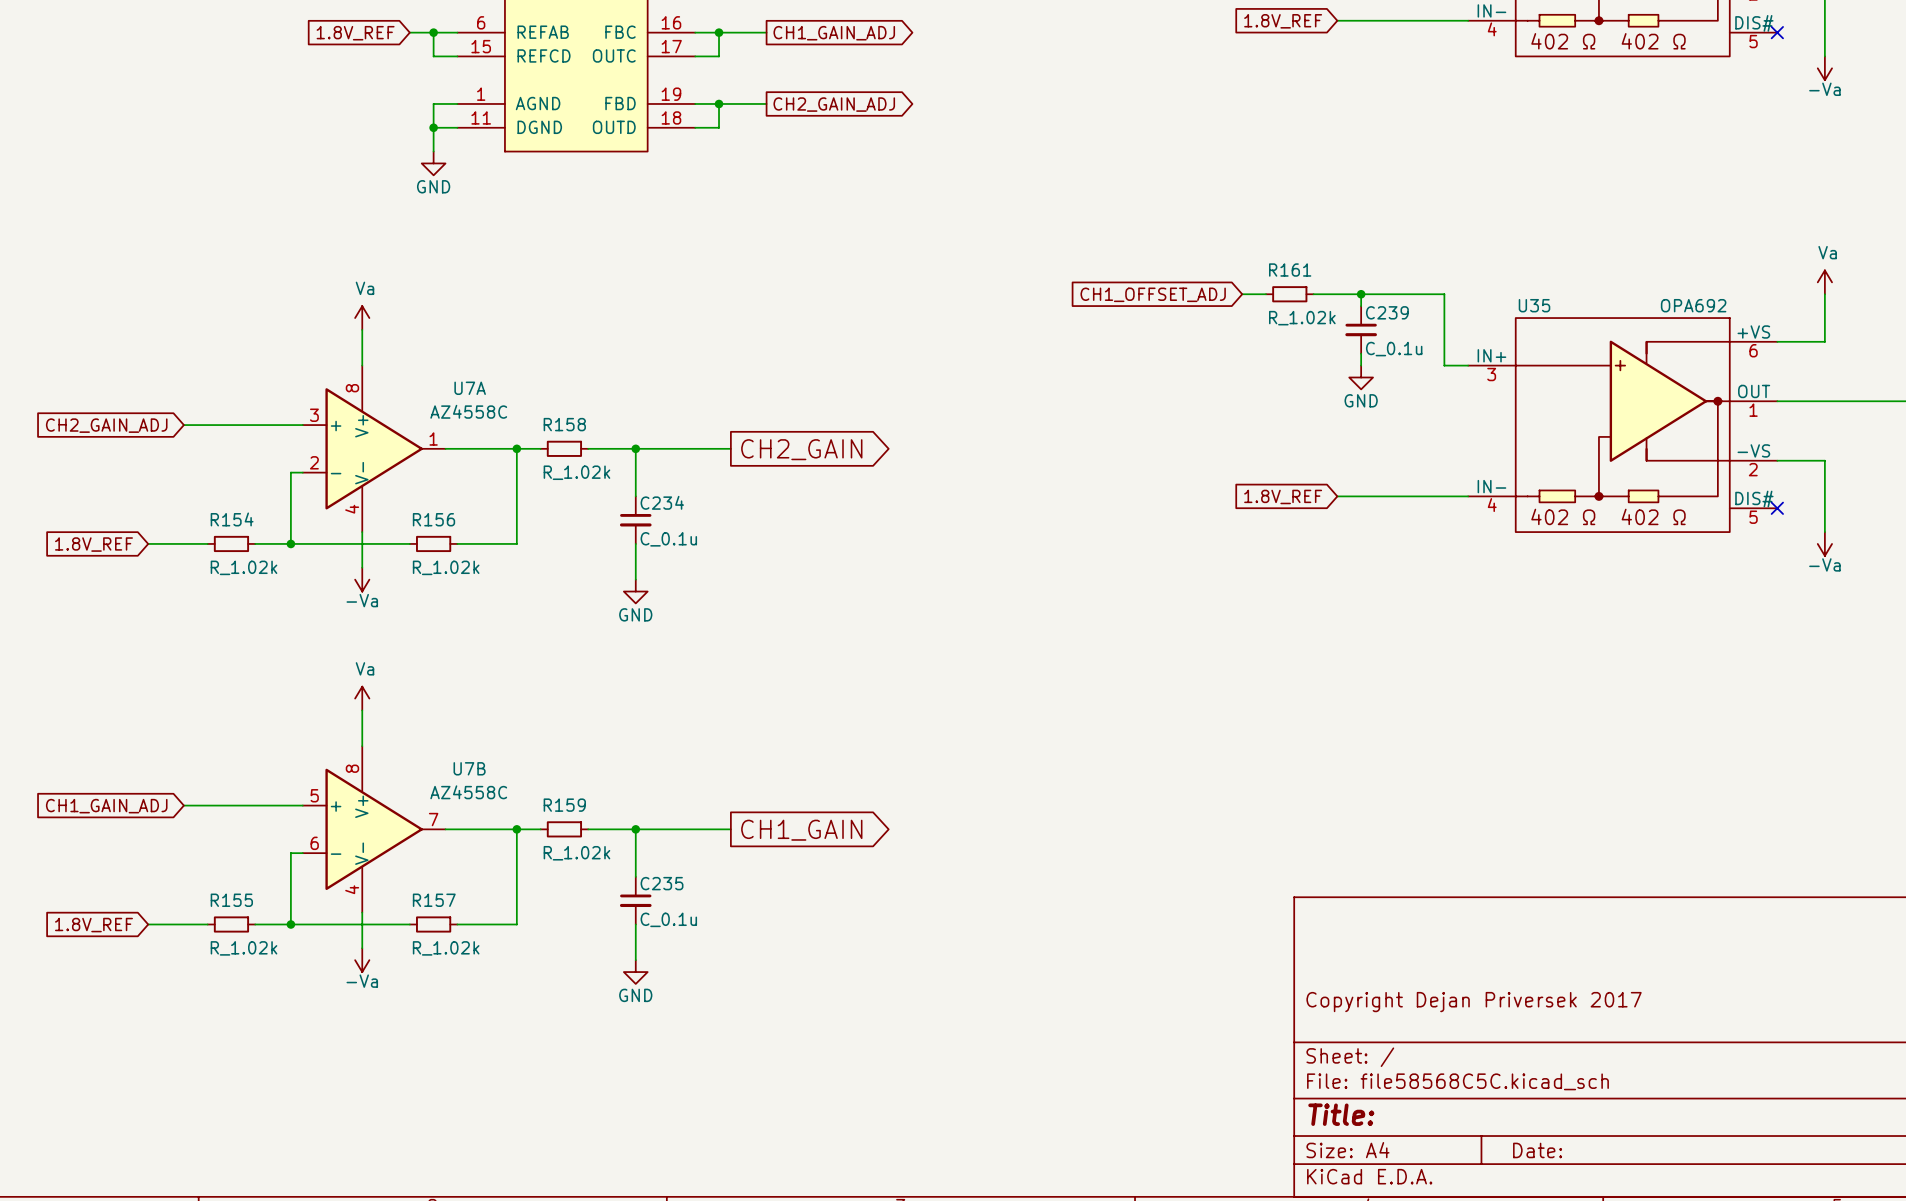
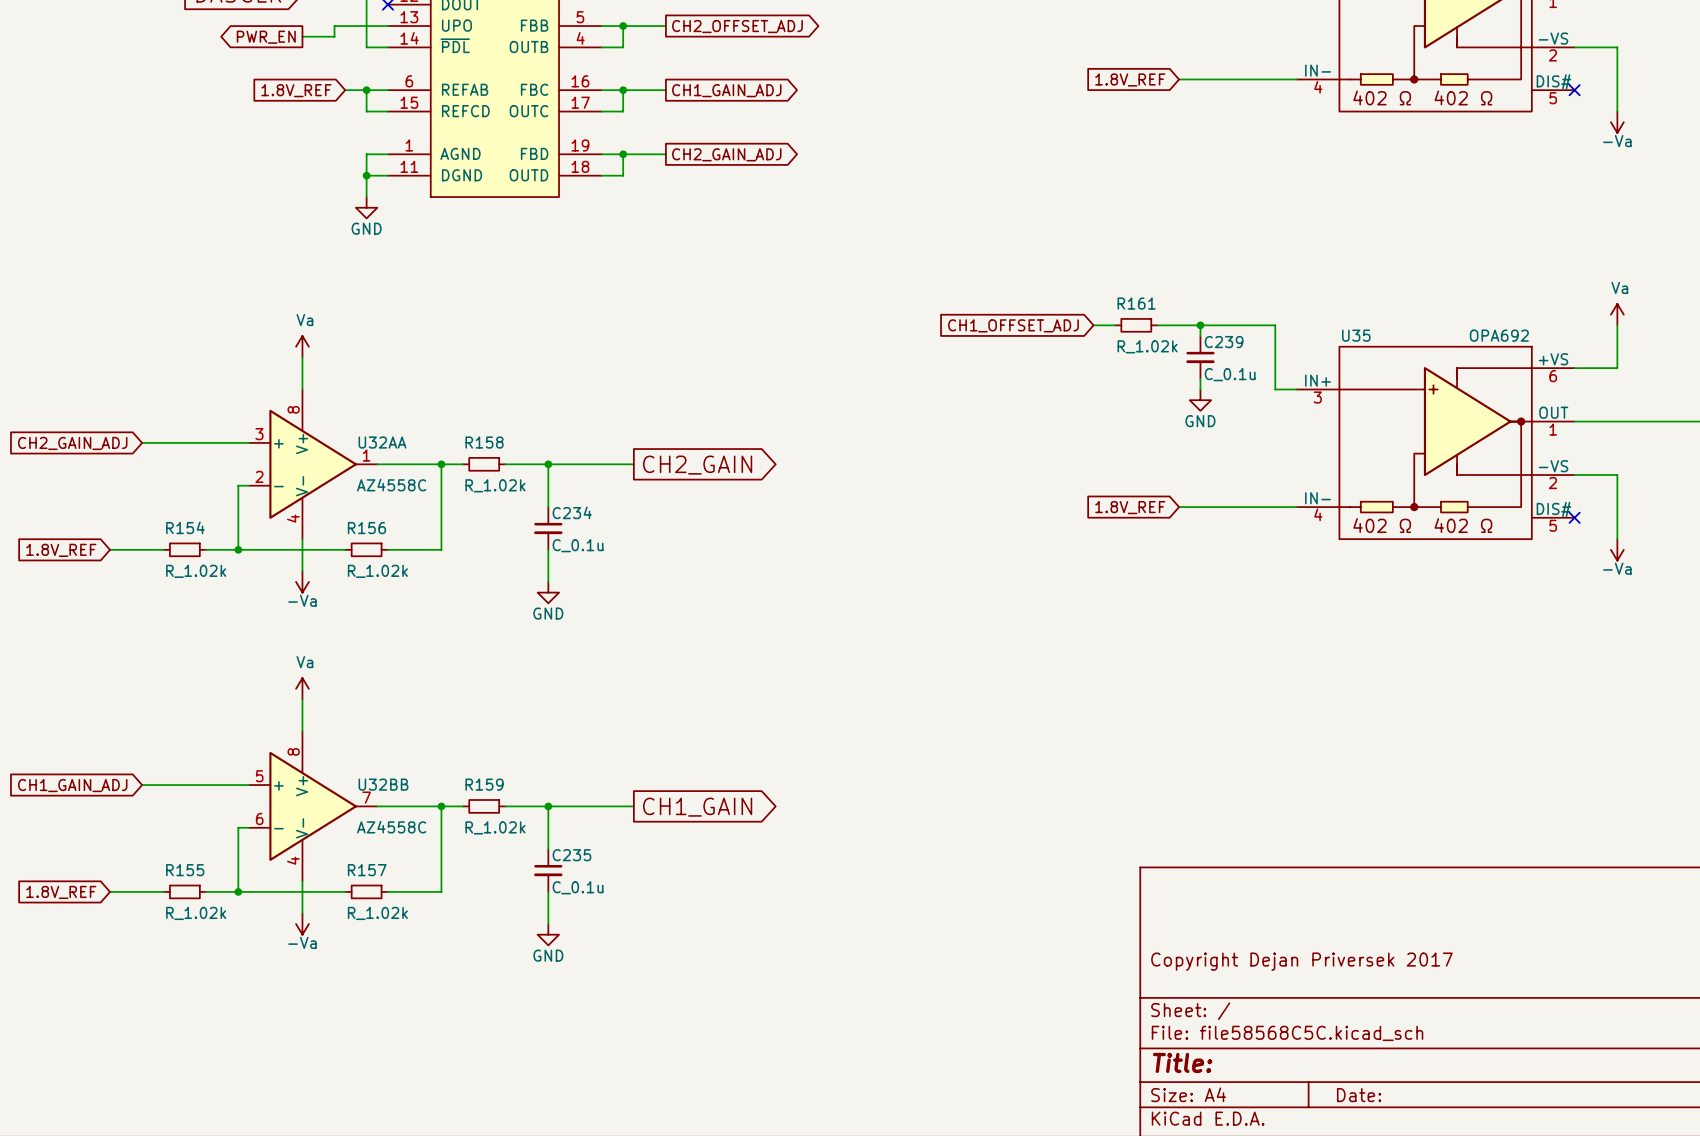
U7A name: U7A (470, 388) -> U32AA (382, 442)
U7A value position: AZ4558C (468, 411) -> AZ4558C (391, 485)
U7B name: U7B (469, 768) -> U32BB (383, 784)
U7B value position: AZ4558C (468, 792) -> AZ4558C (391, 827)

